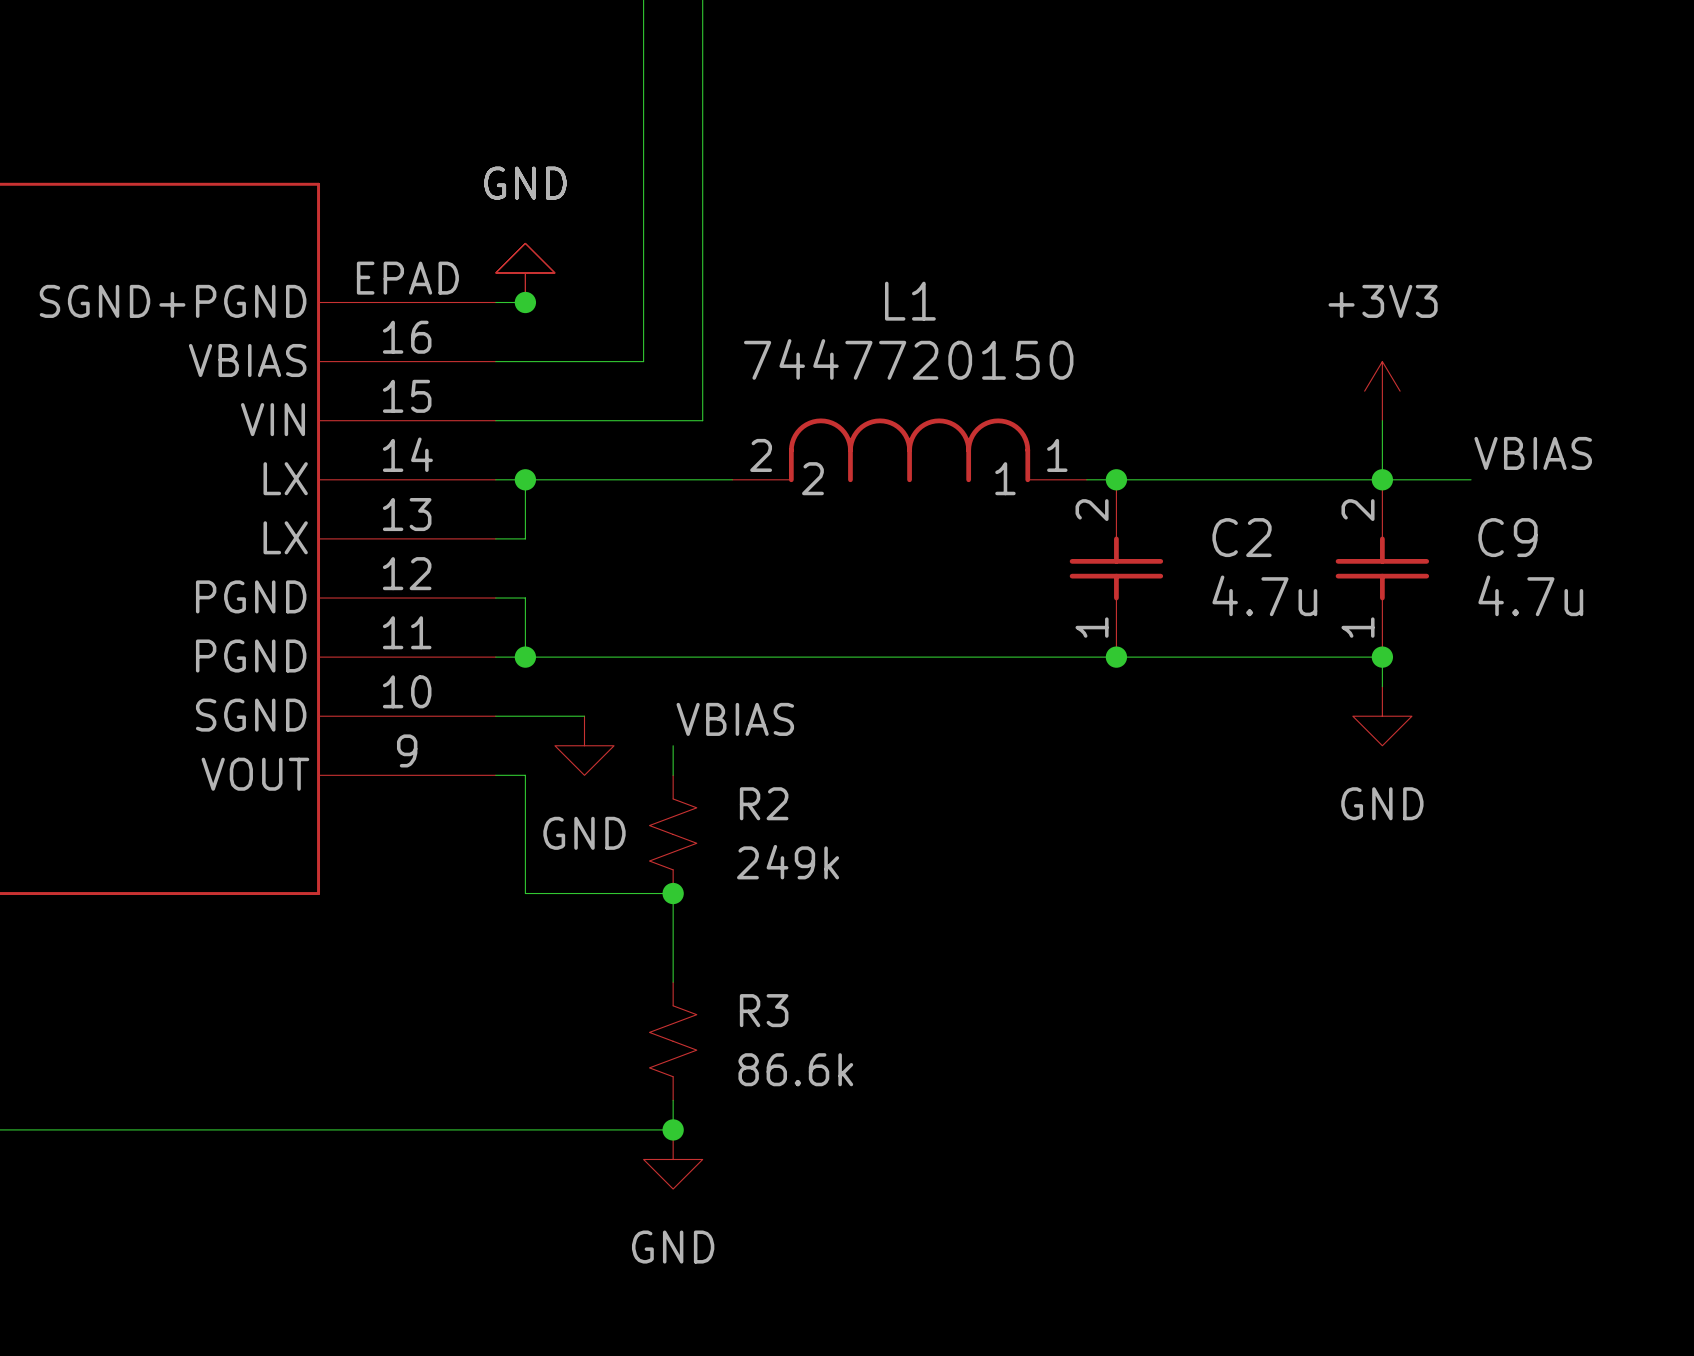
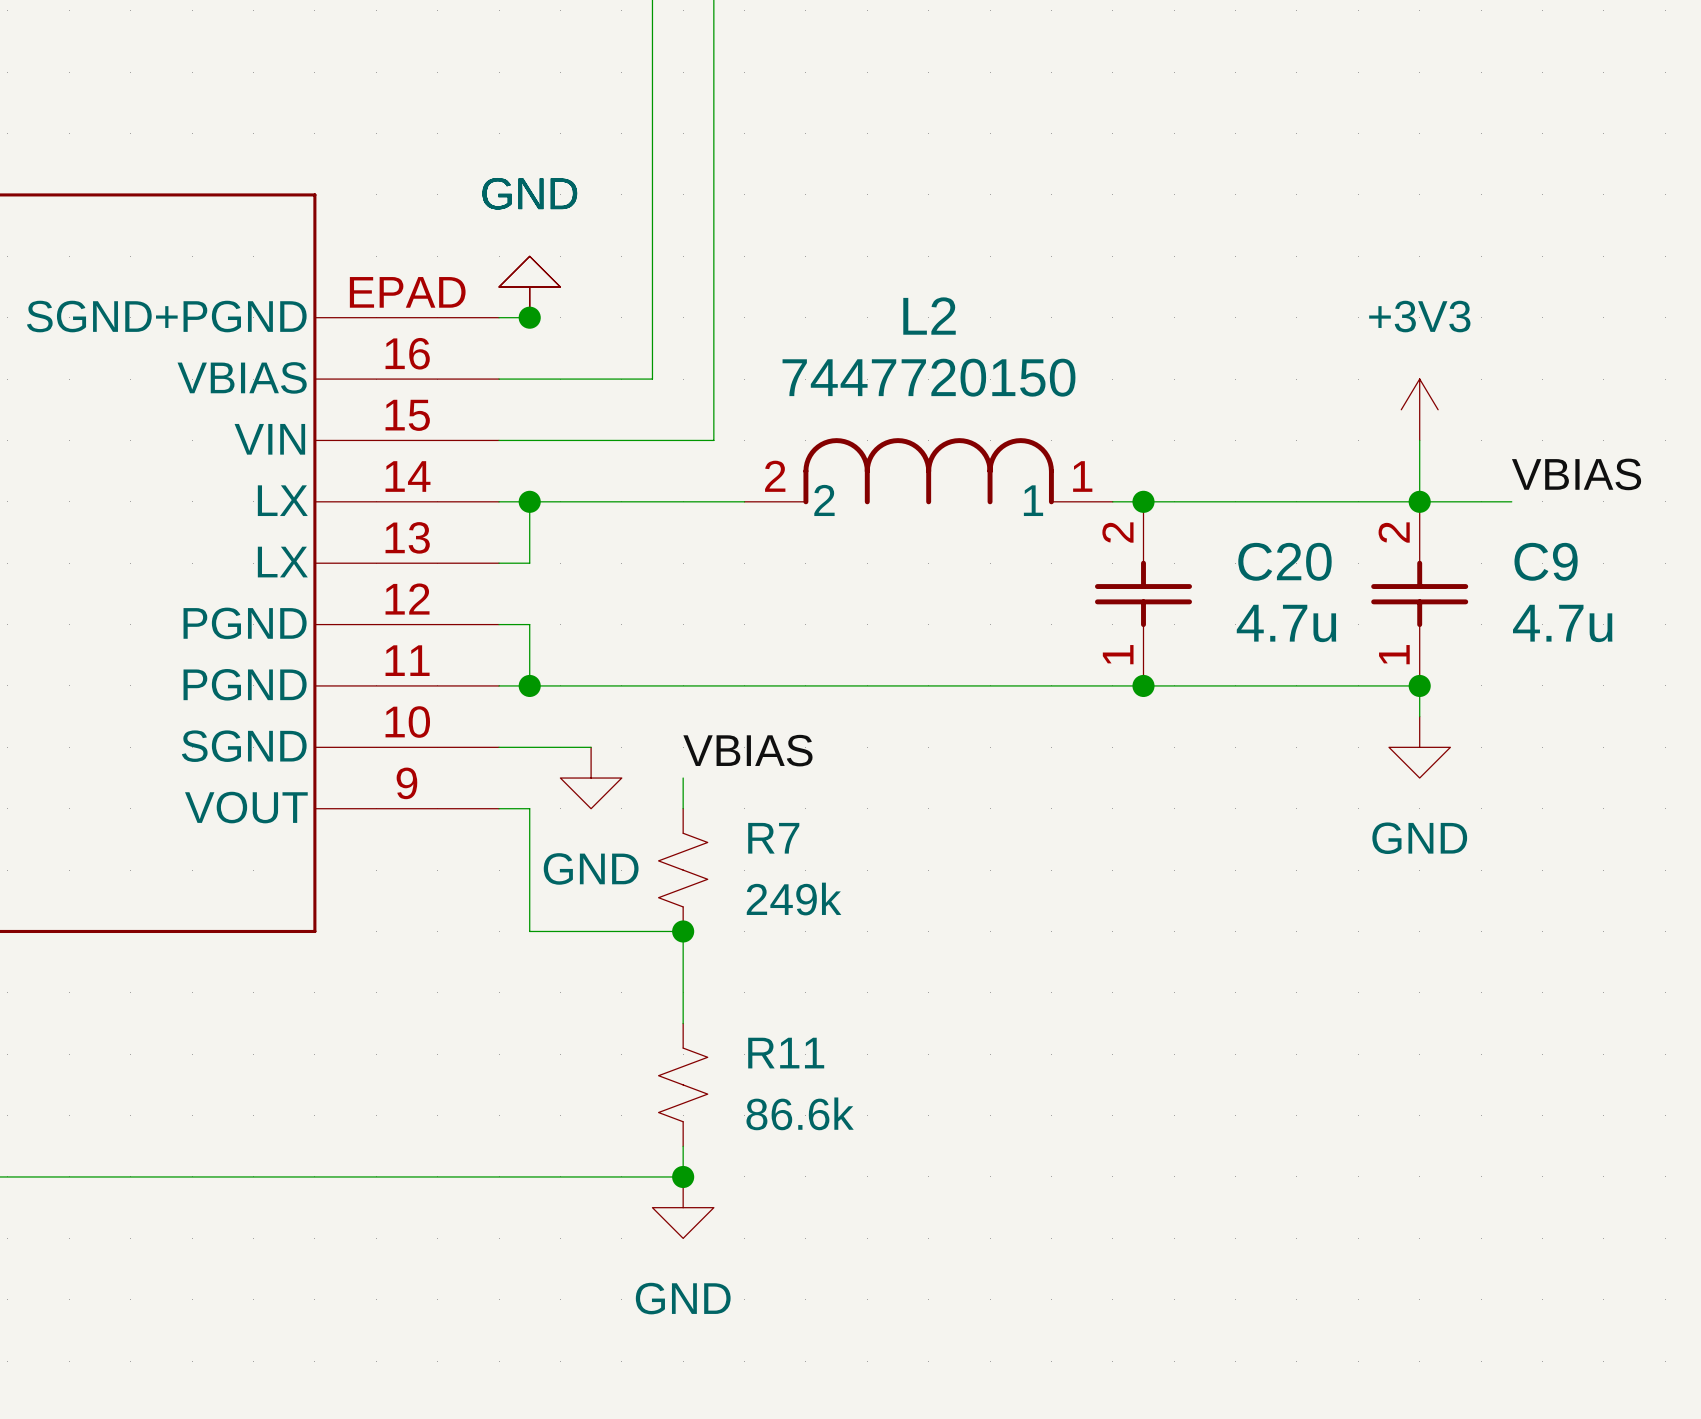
L1 name: L1 (910, 301) -> L2 (929, 316)
C2 name: C2 (1242, 537) -> C20 (1284, 561)
R2 name: R2 (764, 803) -> R7 (773, 838)
R3 name: R3 (764, 1010) -> R11 (786, 1053)

